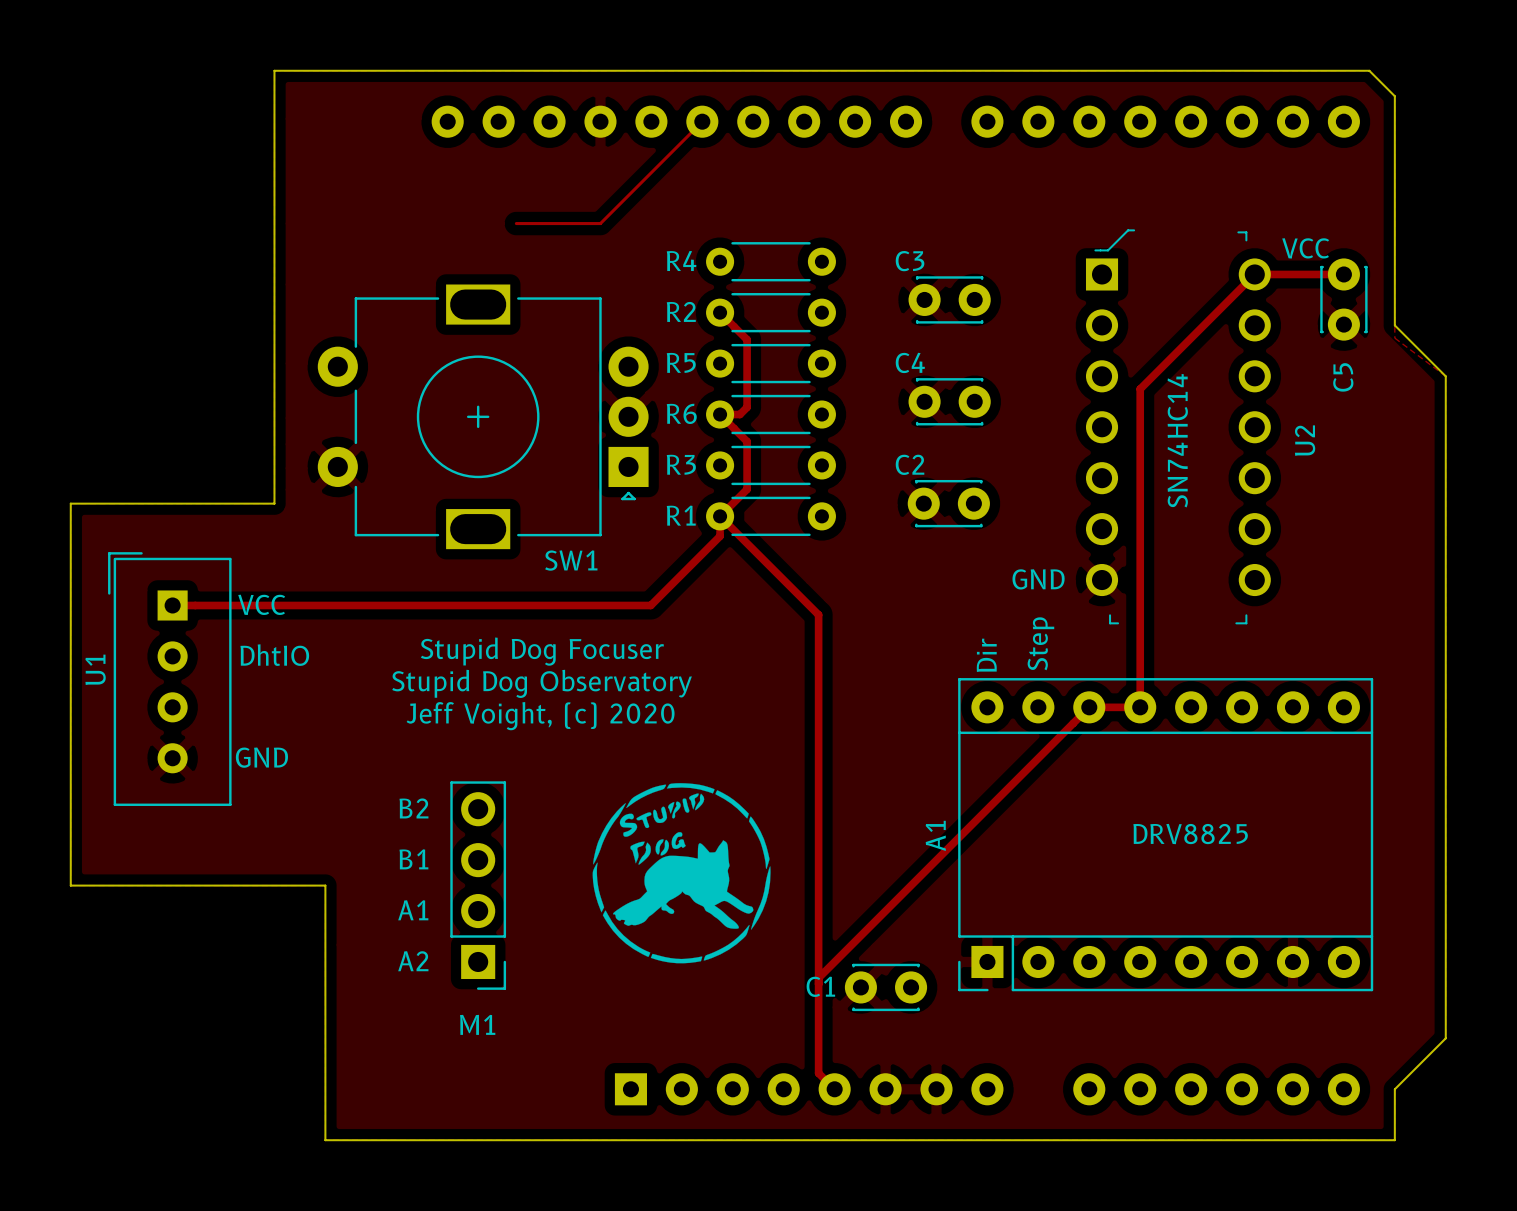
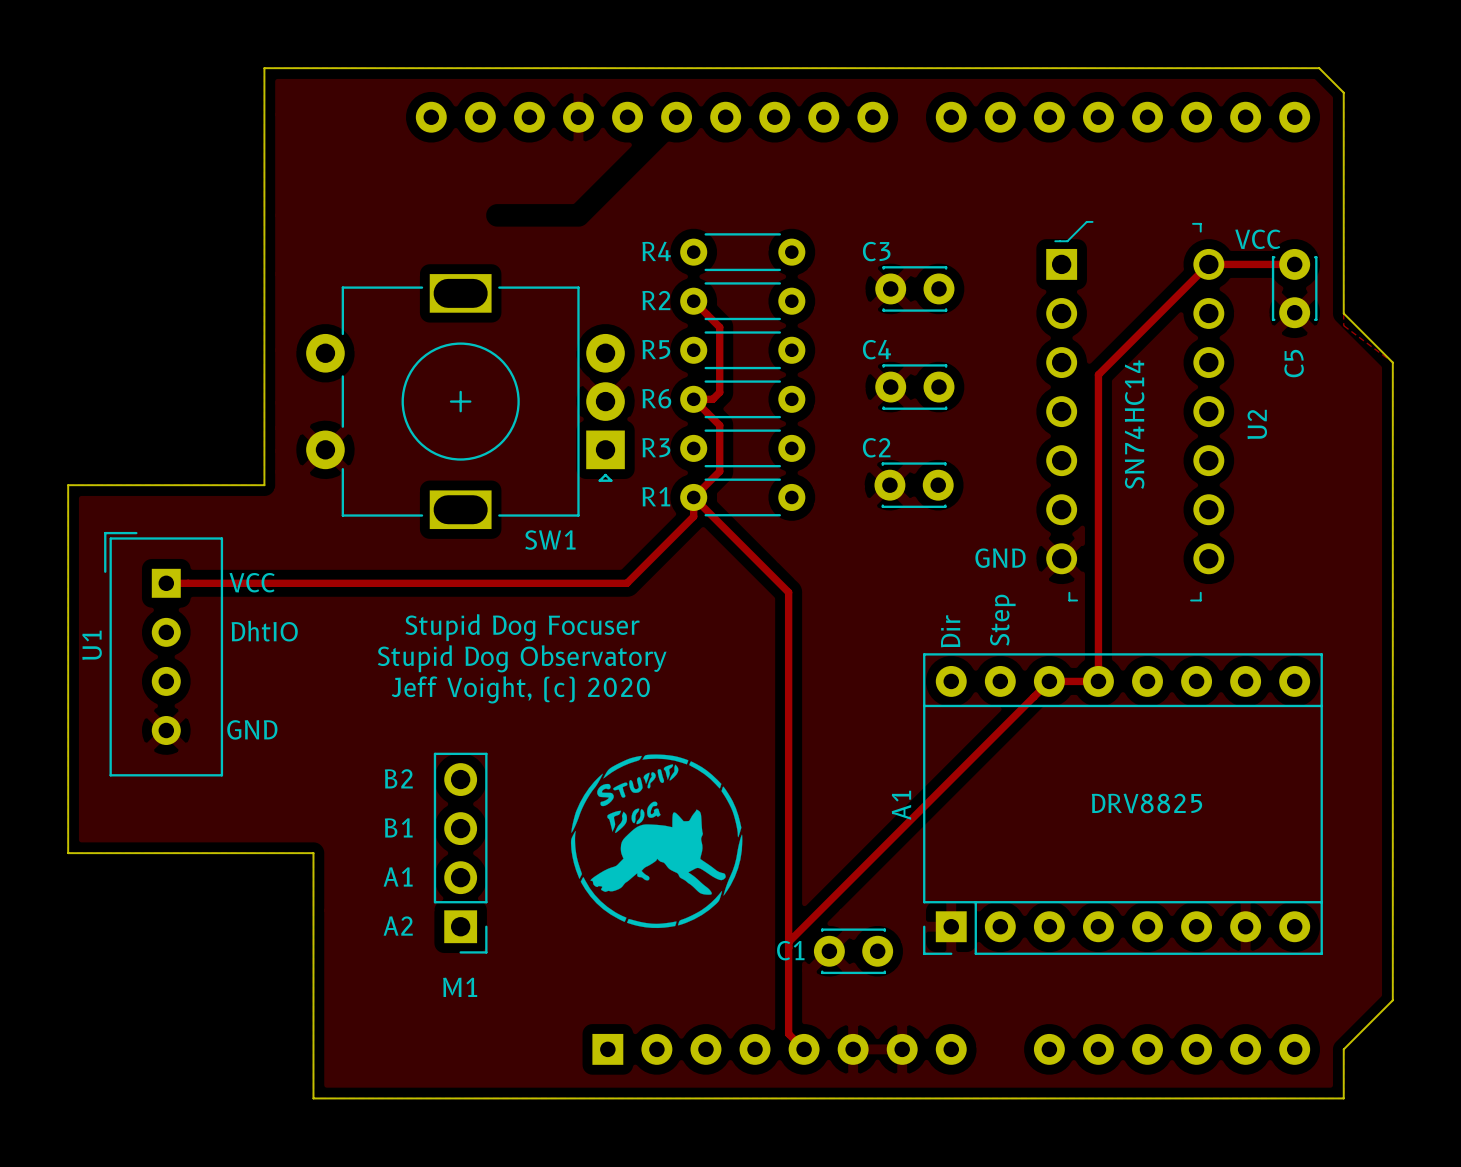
track: (702, 121) (600, 223) (516, 223) -> none

